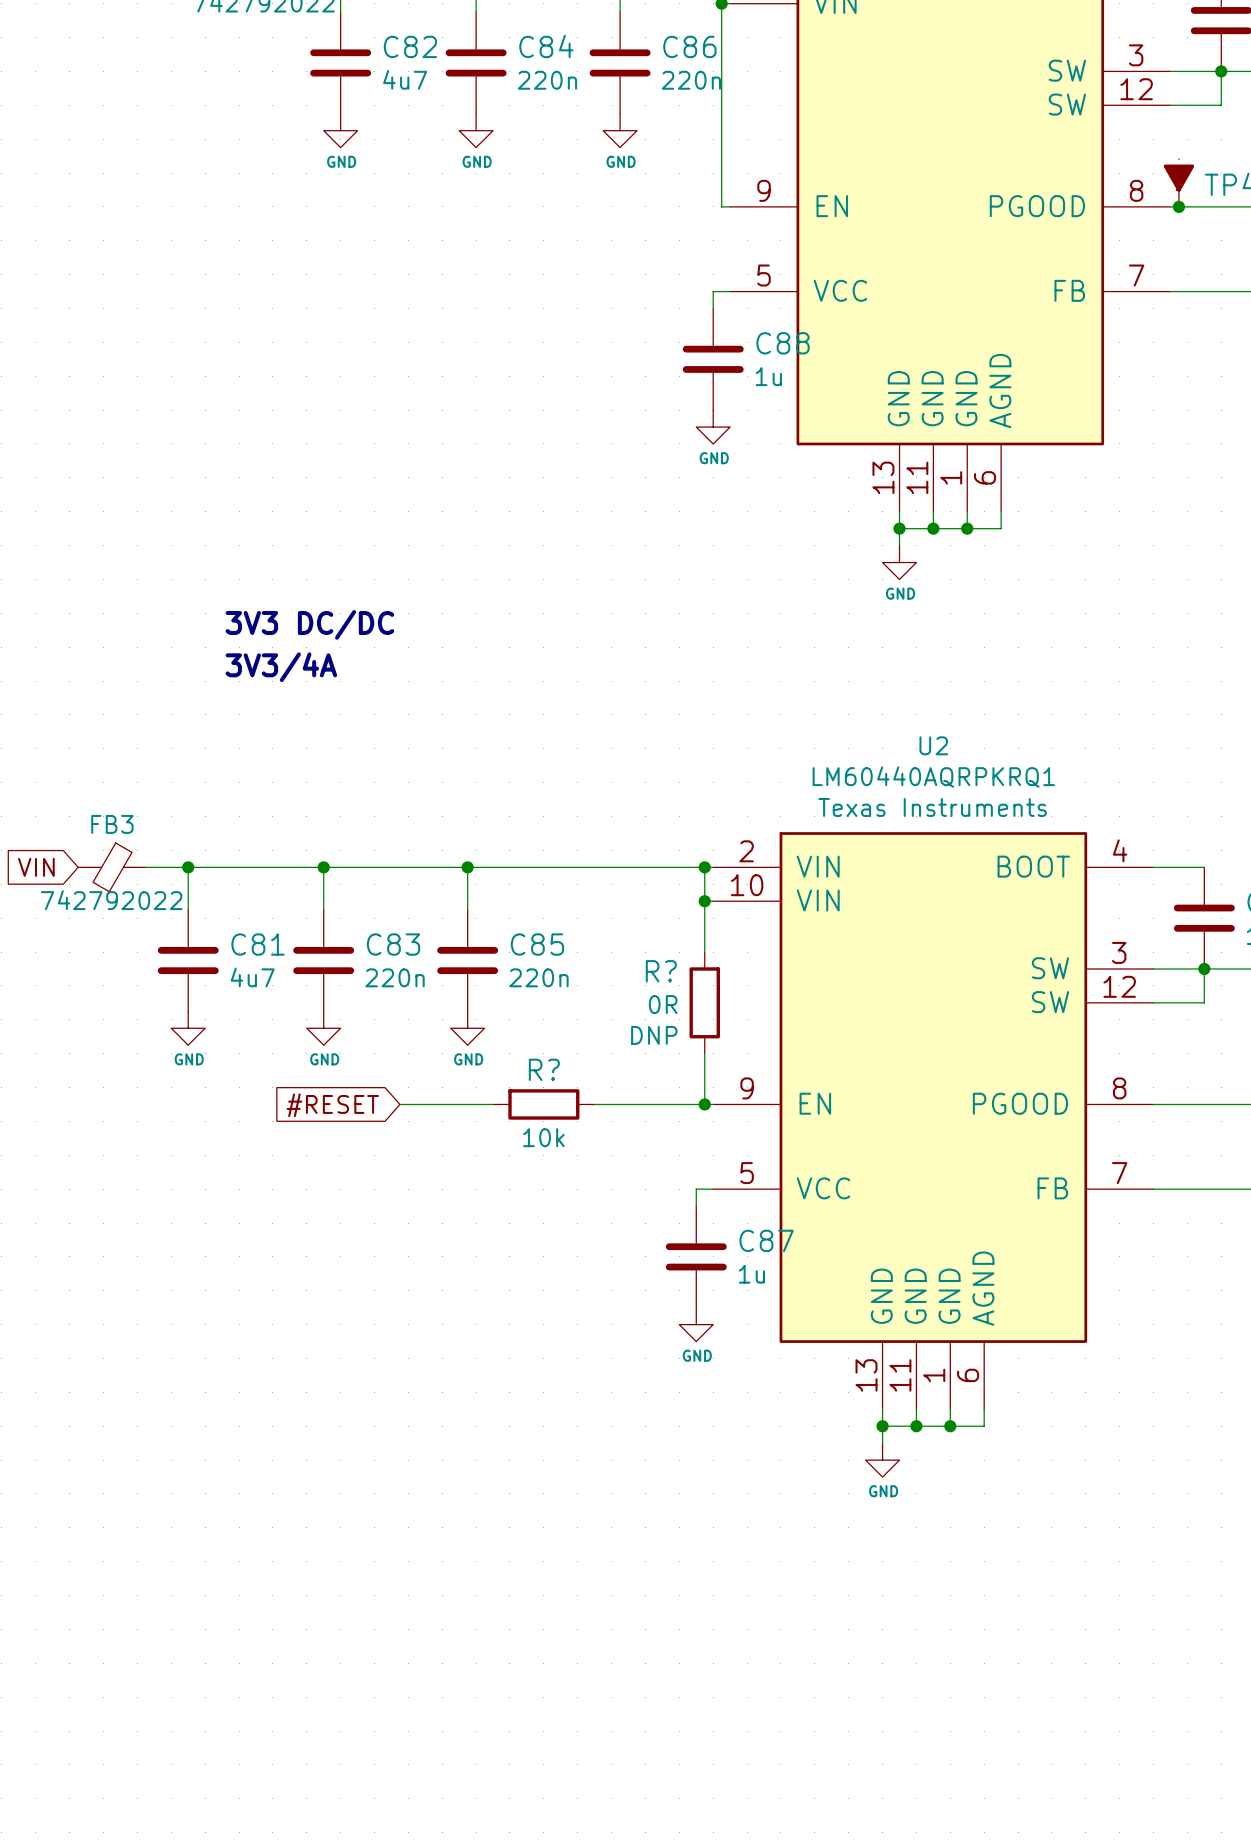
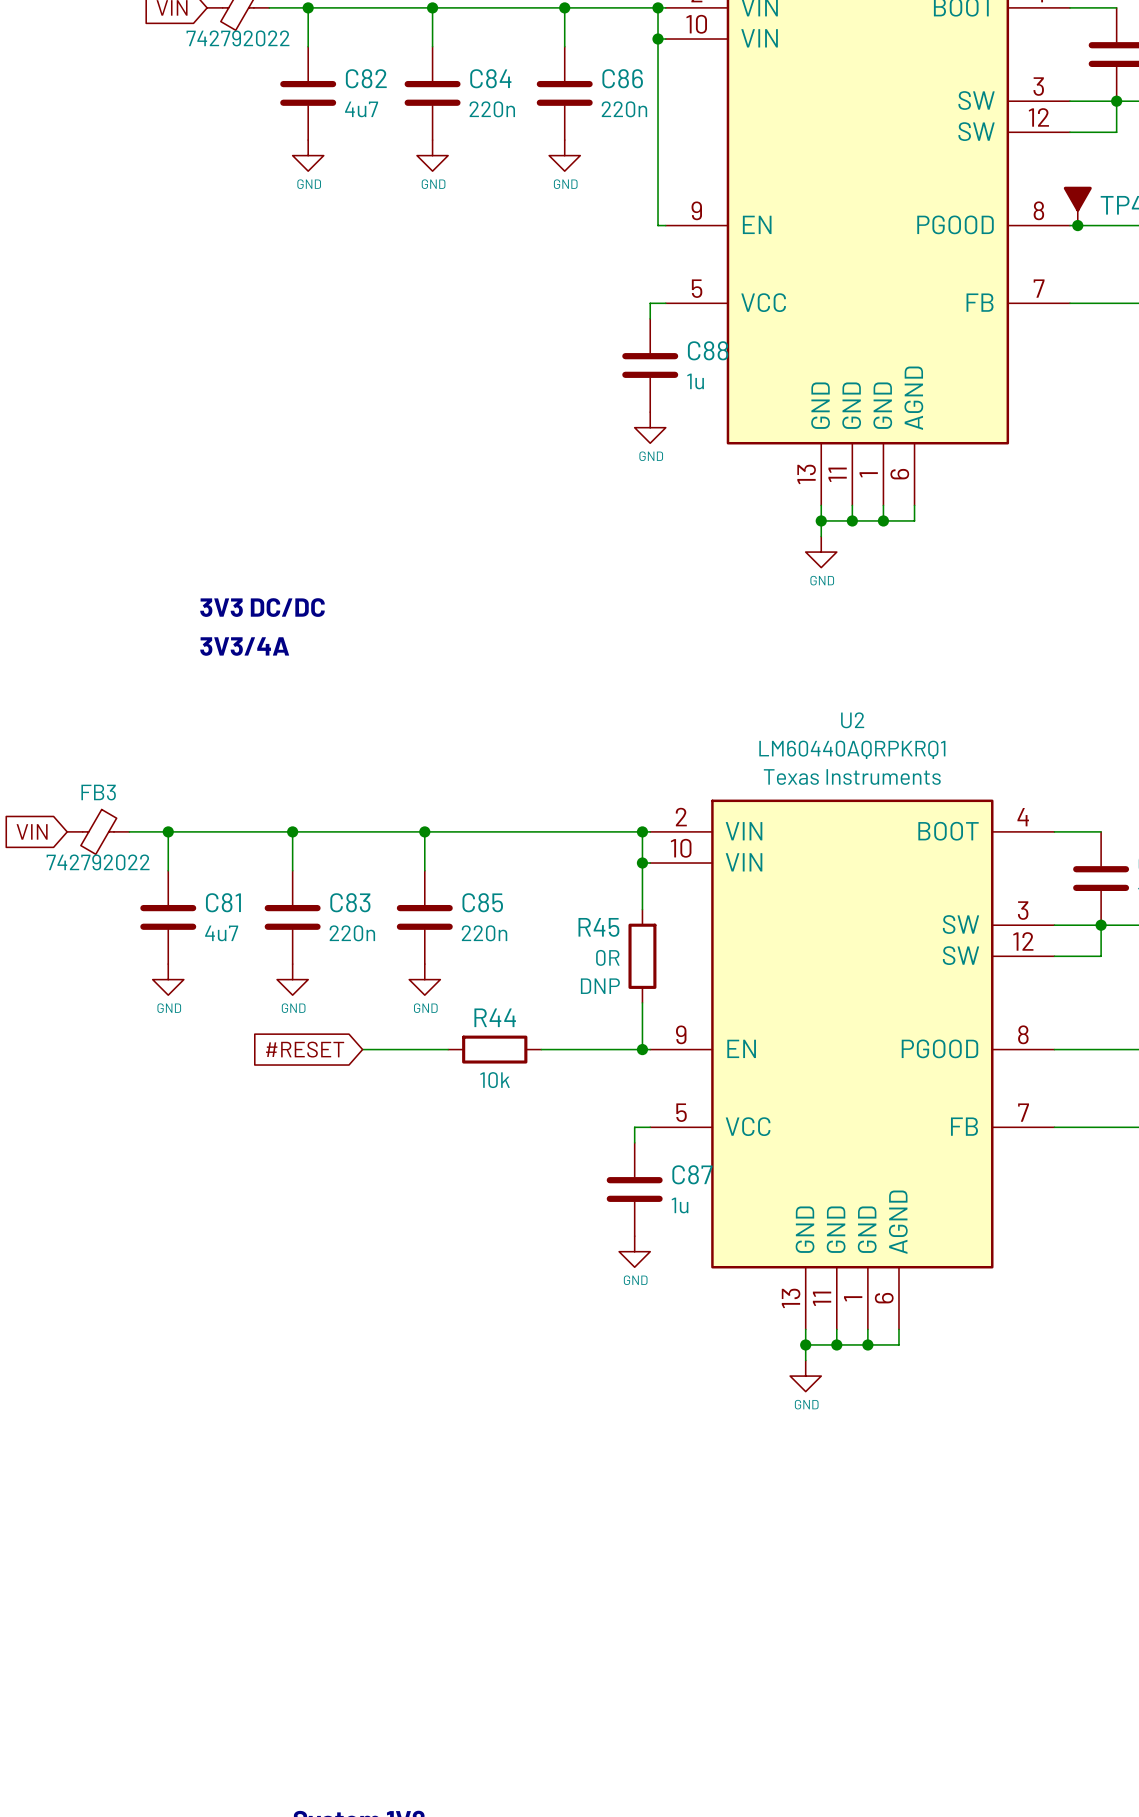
R? name: R? (661, 971) -> R45 (598, 927)
R? name: R? (544, 1069) -> R44 (495, 1017)

